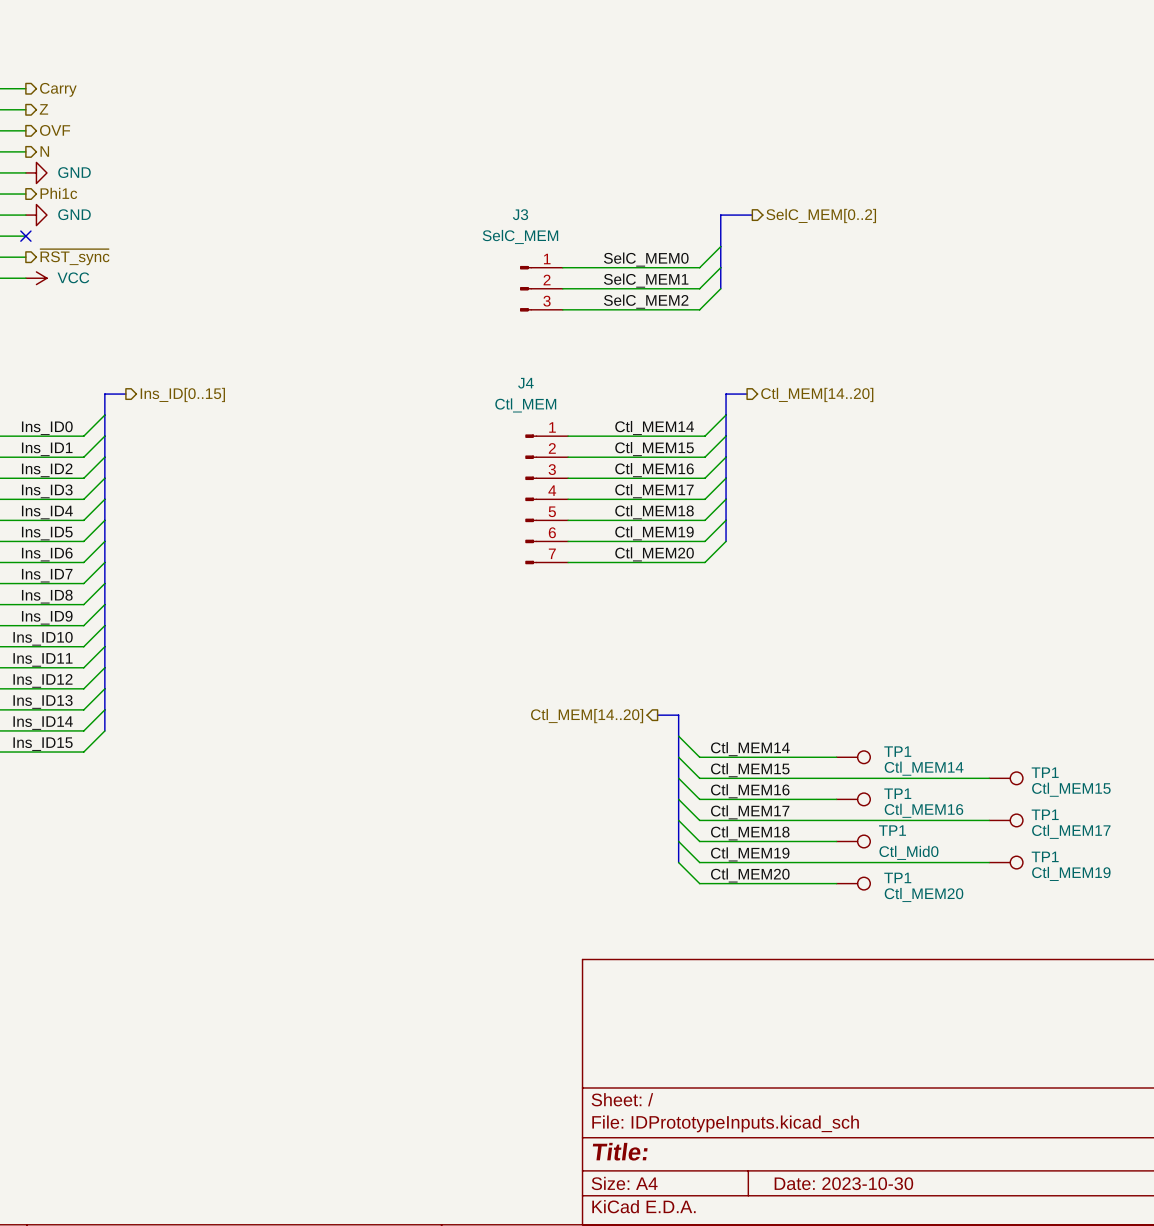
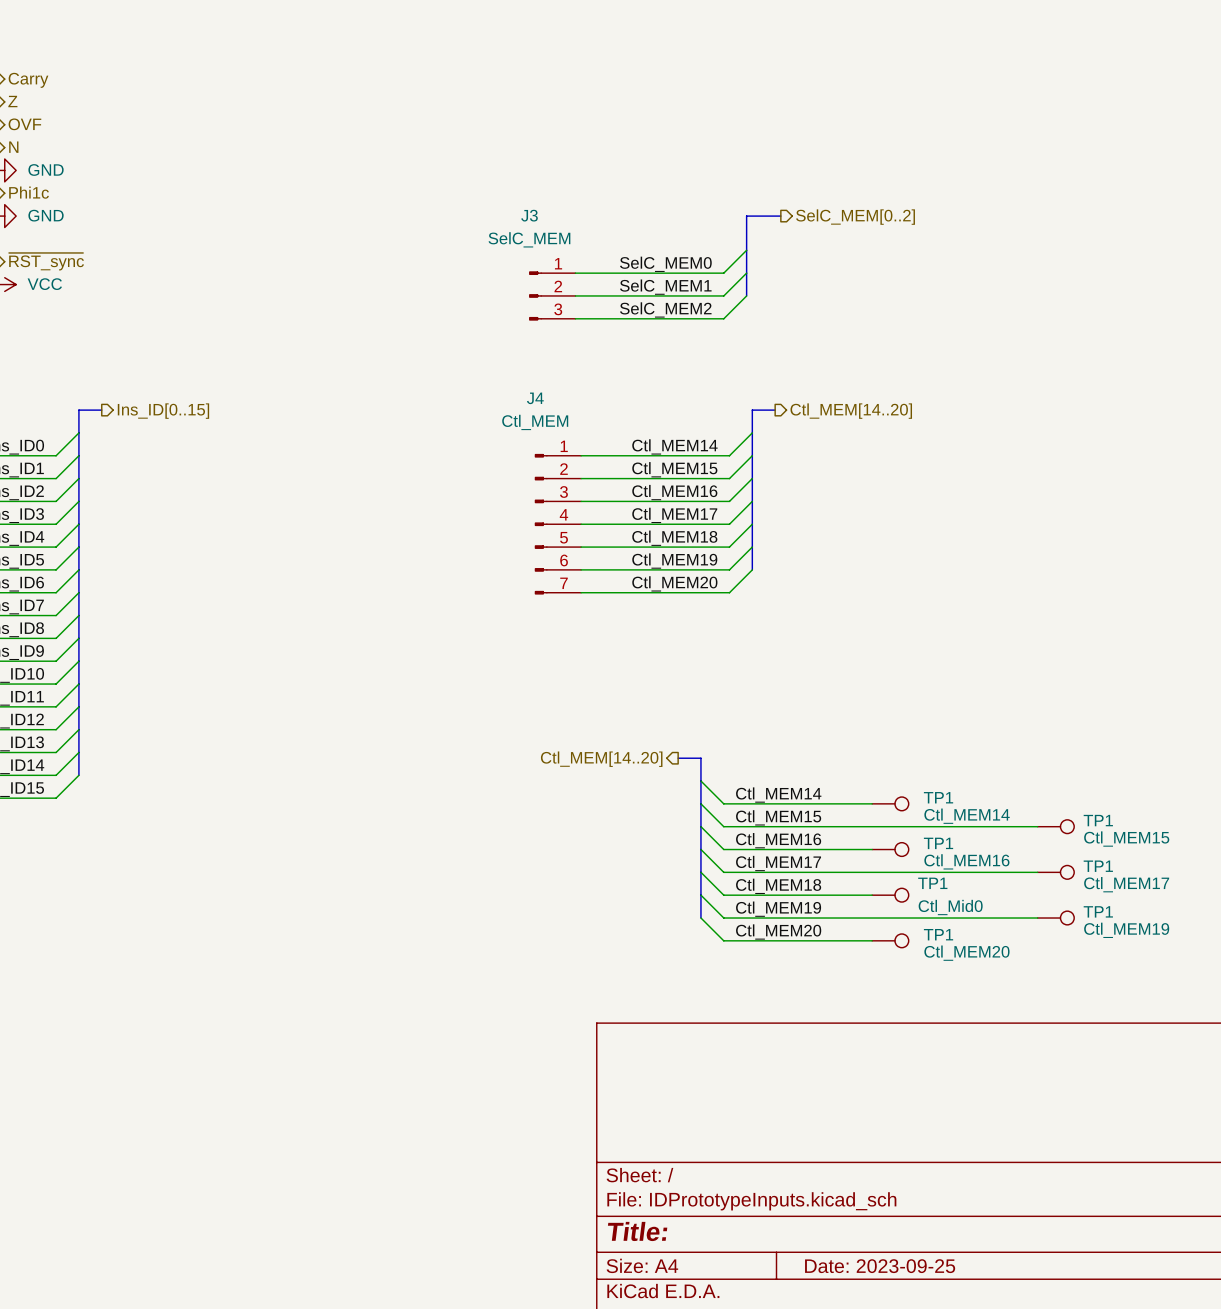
title block: Date: 2023-10-30 (843, 1183) -> Date: 2023-09-25 (880, 1266)

